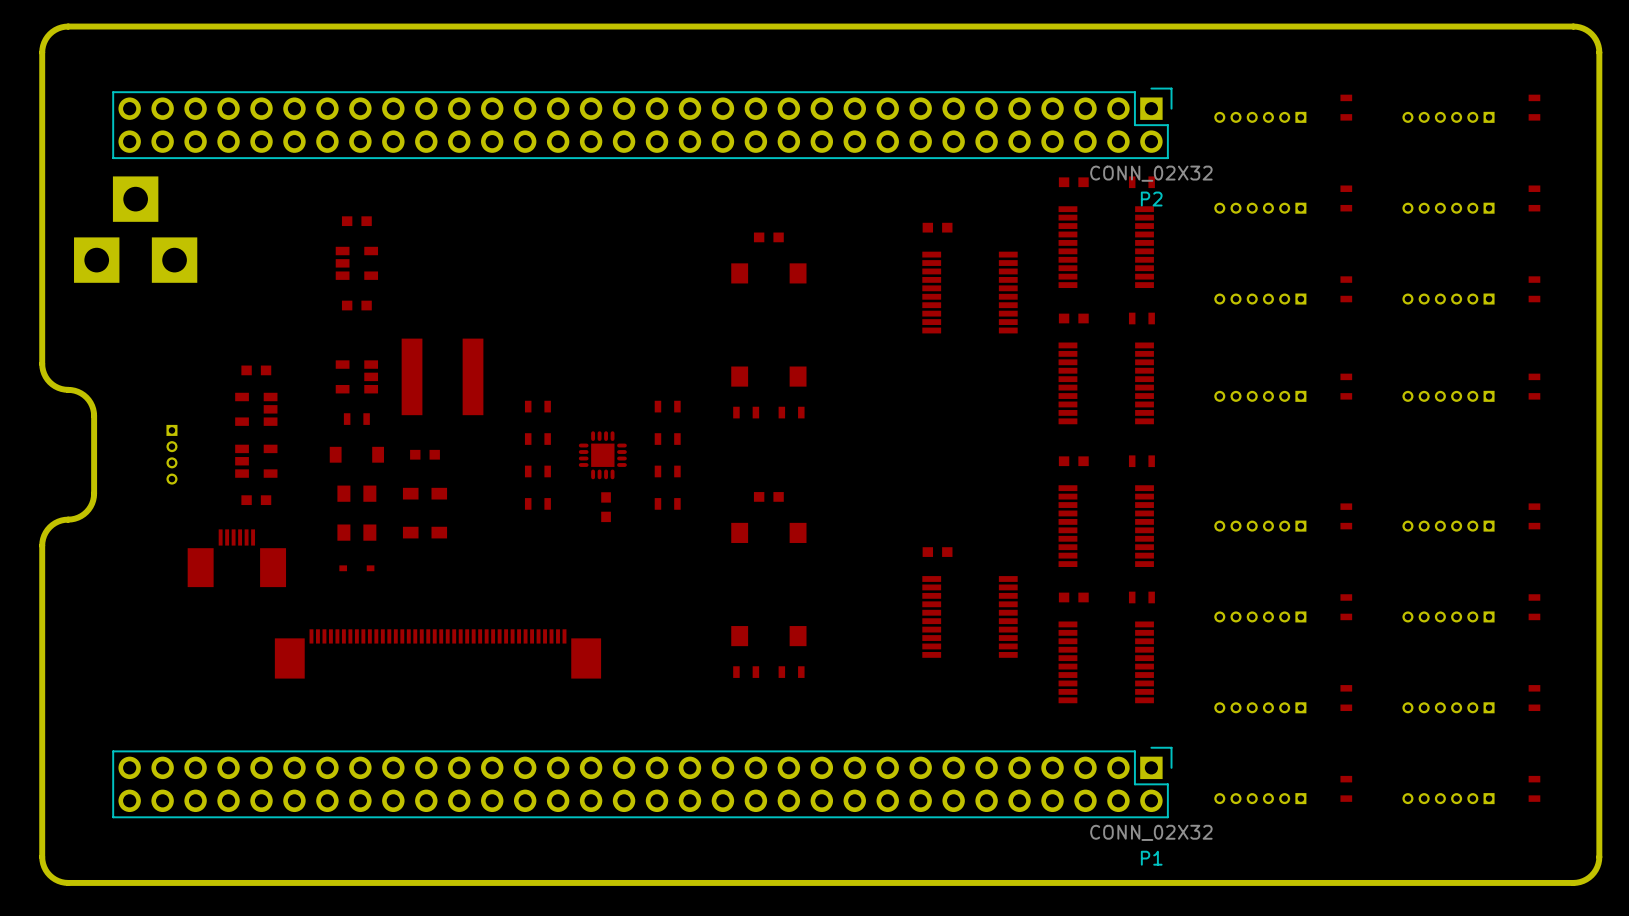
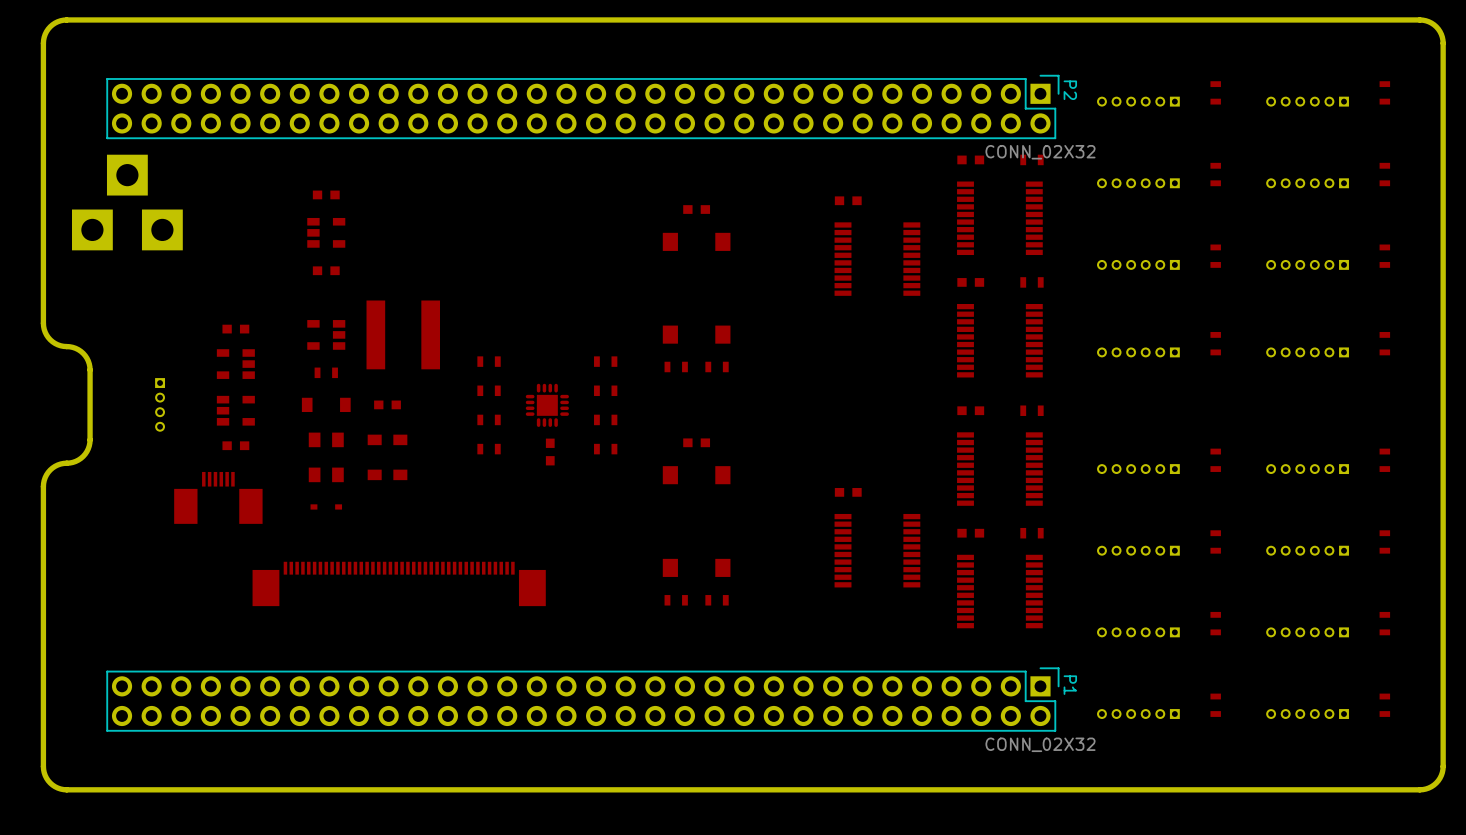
P2 name rotation: 0° (1151, 199) -> 90° clockwise (1070, 90)
P2 name position: P2 (1151, 199) -> P2 (1070, 90)
P1 name rotation: 0° (1151, 858) -> 90° clockwise (1070, 685)
P1 name position: P1 (1151, 858) -> P1 (1070, 685)

